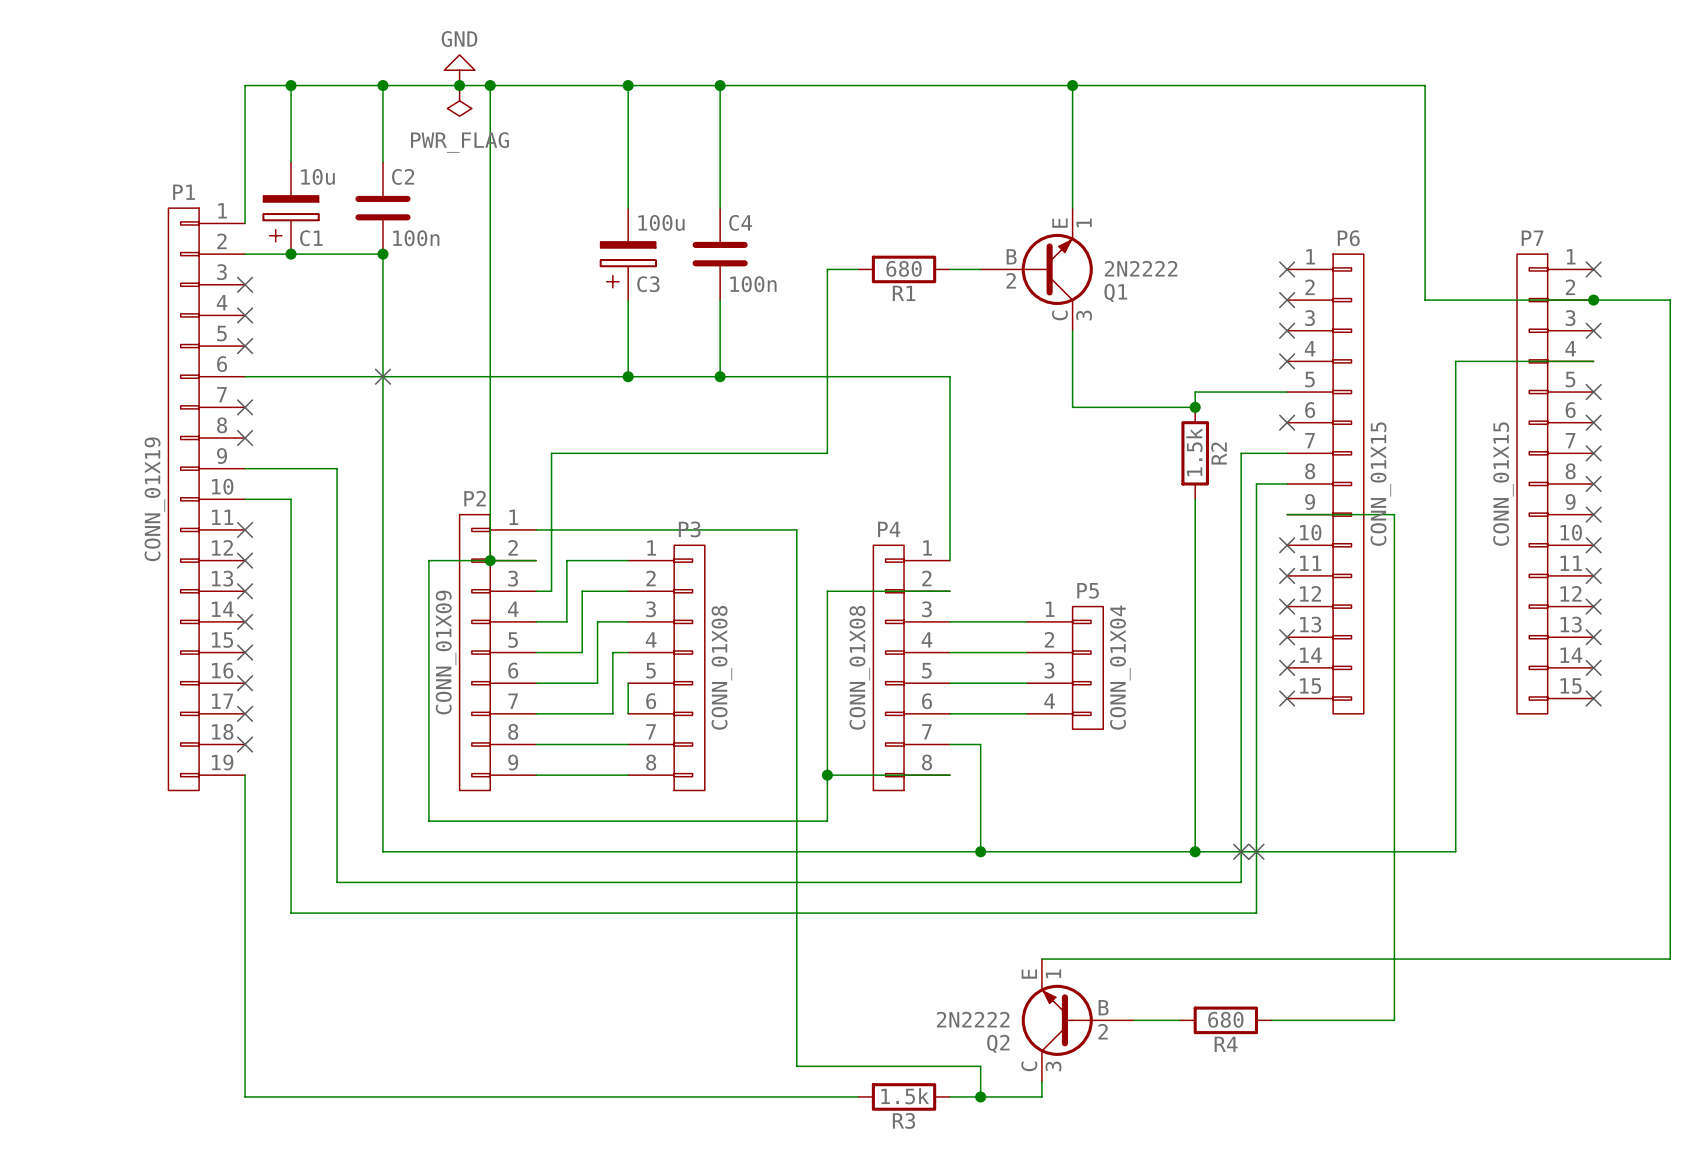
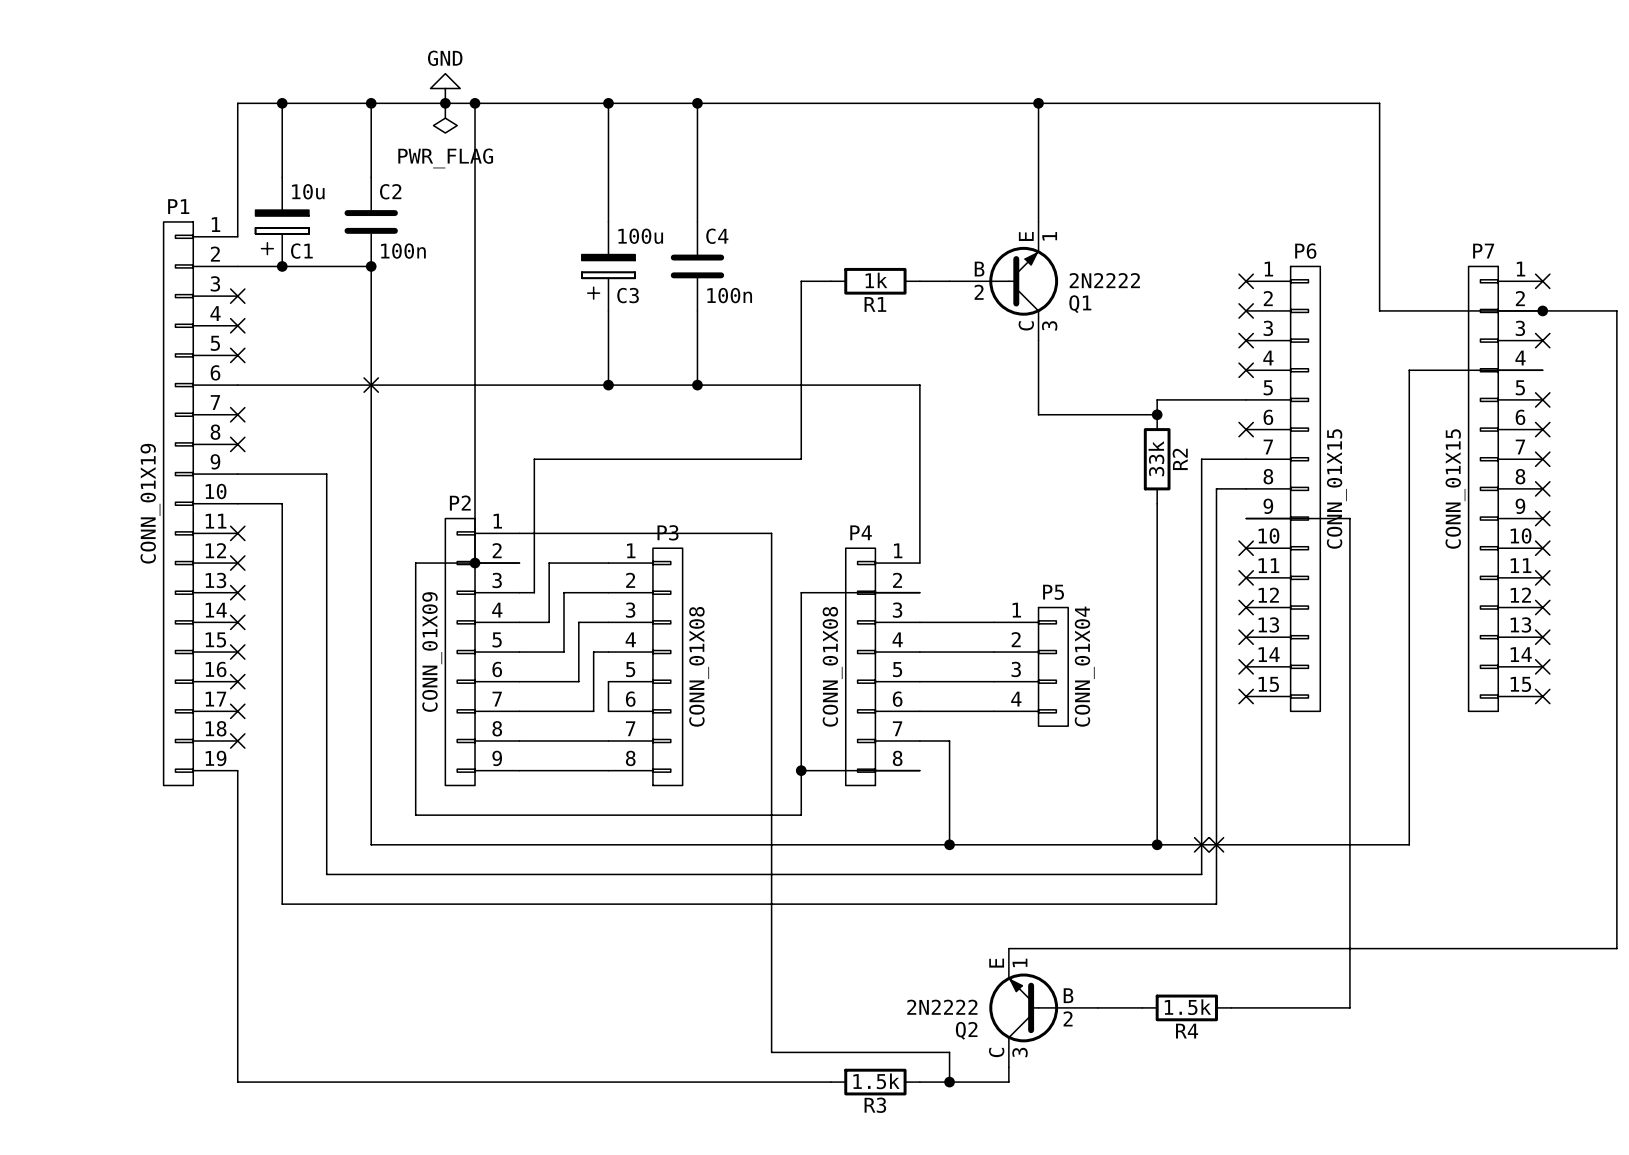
R1 value: 680 (904, 268) -> 1k (876, 280)
R2 value: 1.5k (1194, 452) -> 33k (1156, 458)
R4 value: 680 (1225, 1019) -> 1.5k (1187, 1007)

